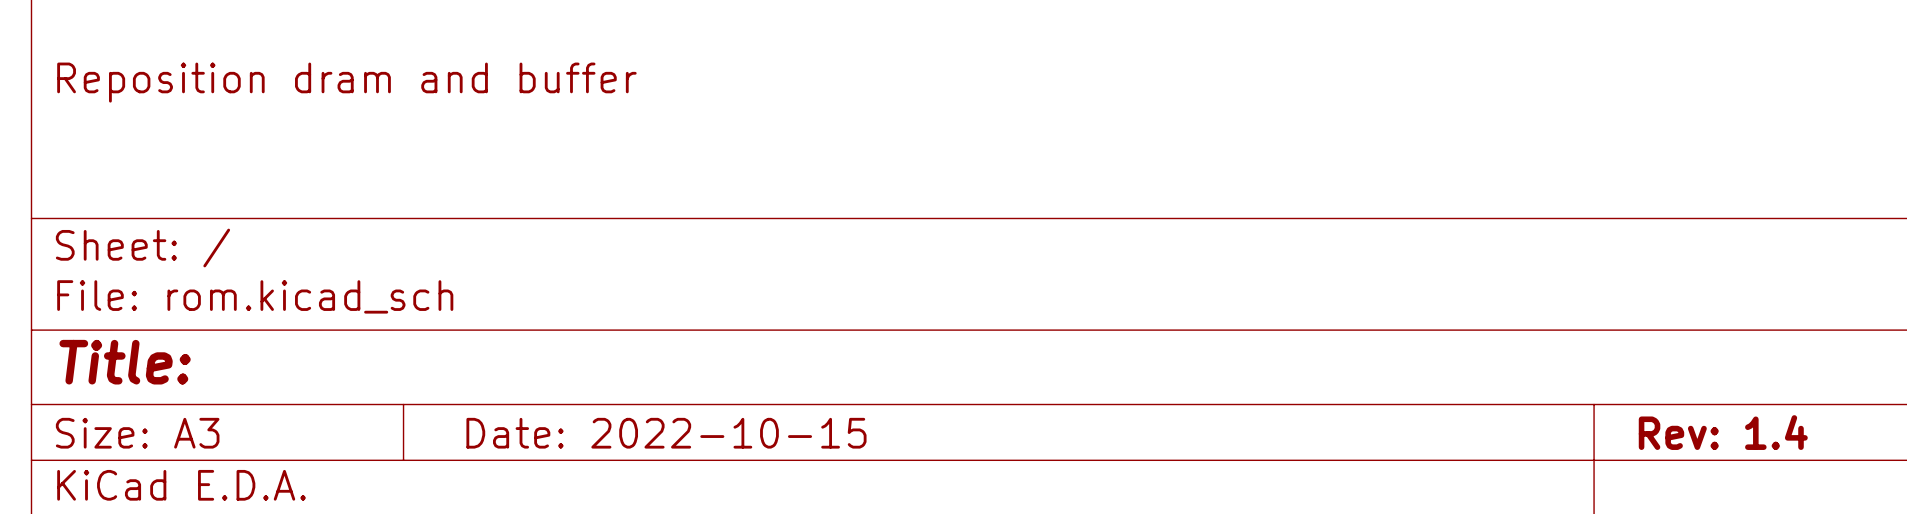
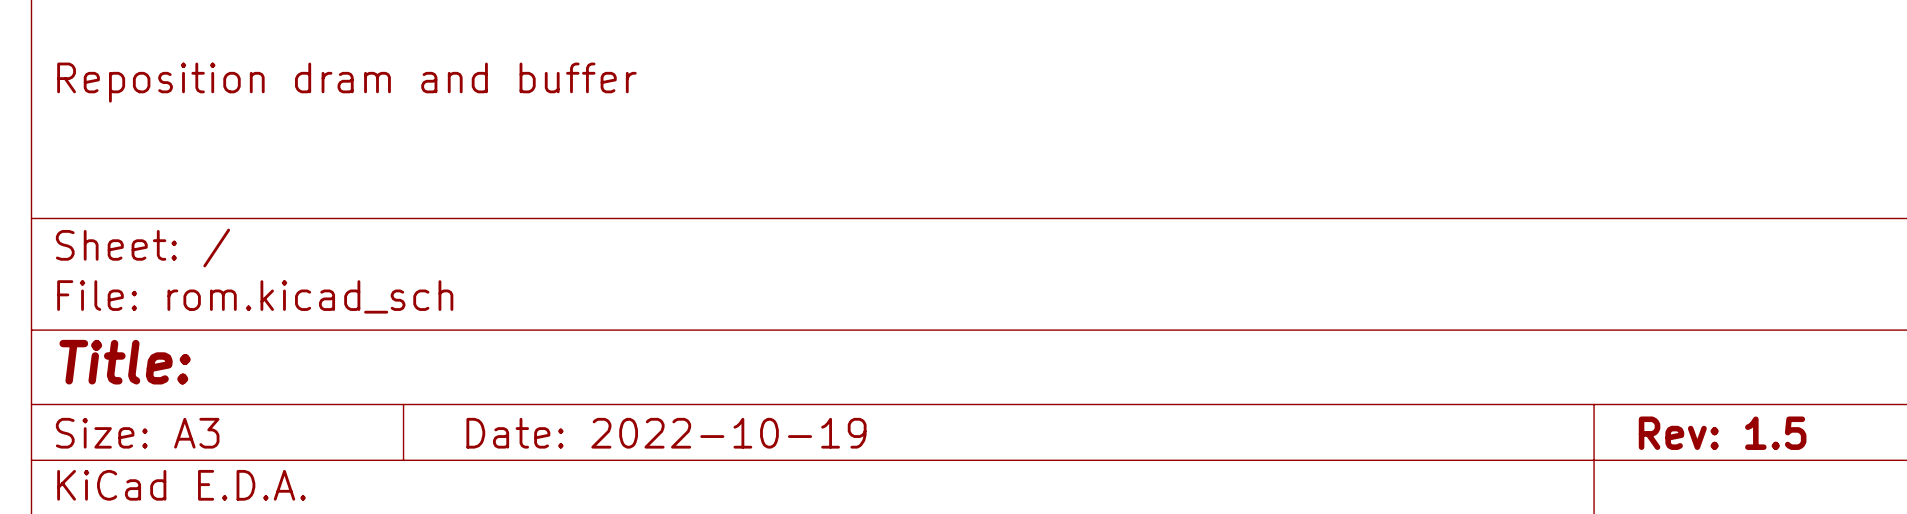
title block: Rev: 1.4 (1723, 432) -> Rev: 1.5 (1722, 433)
title block: Date: 2022-10-15 (666, 433) -> Date: 2022-10-19 (666, 433)

